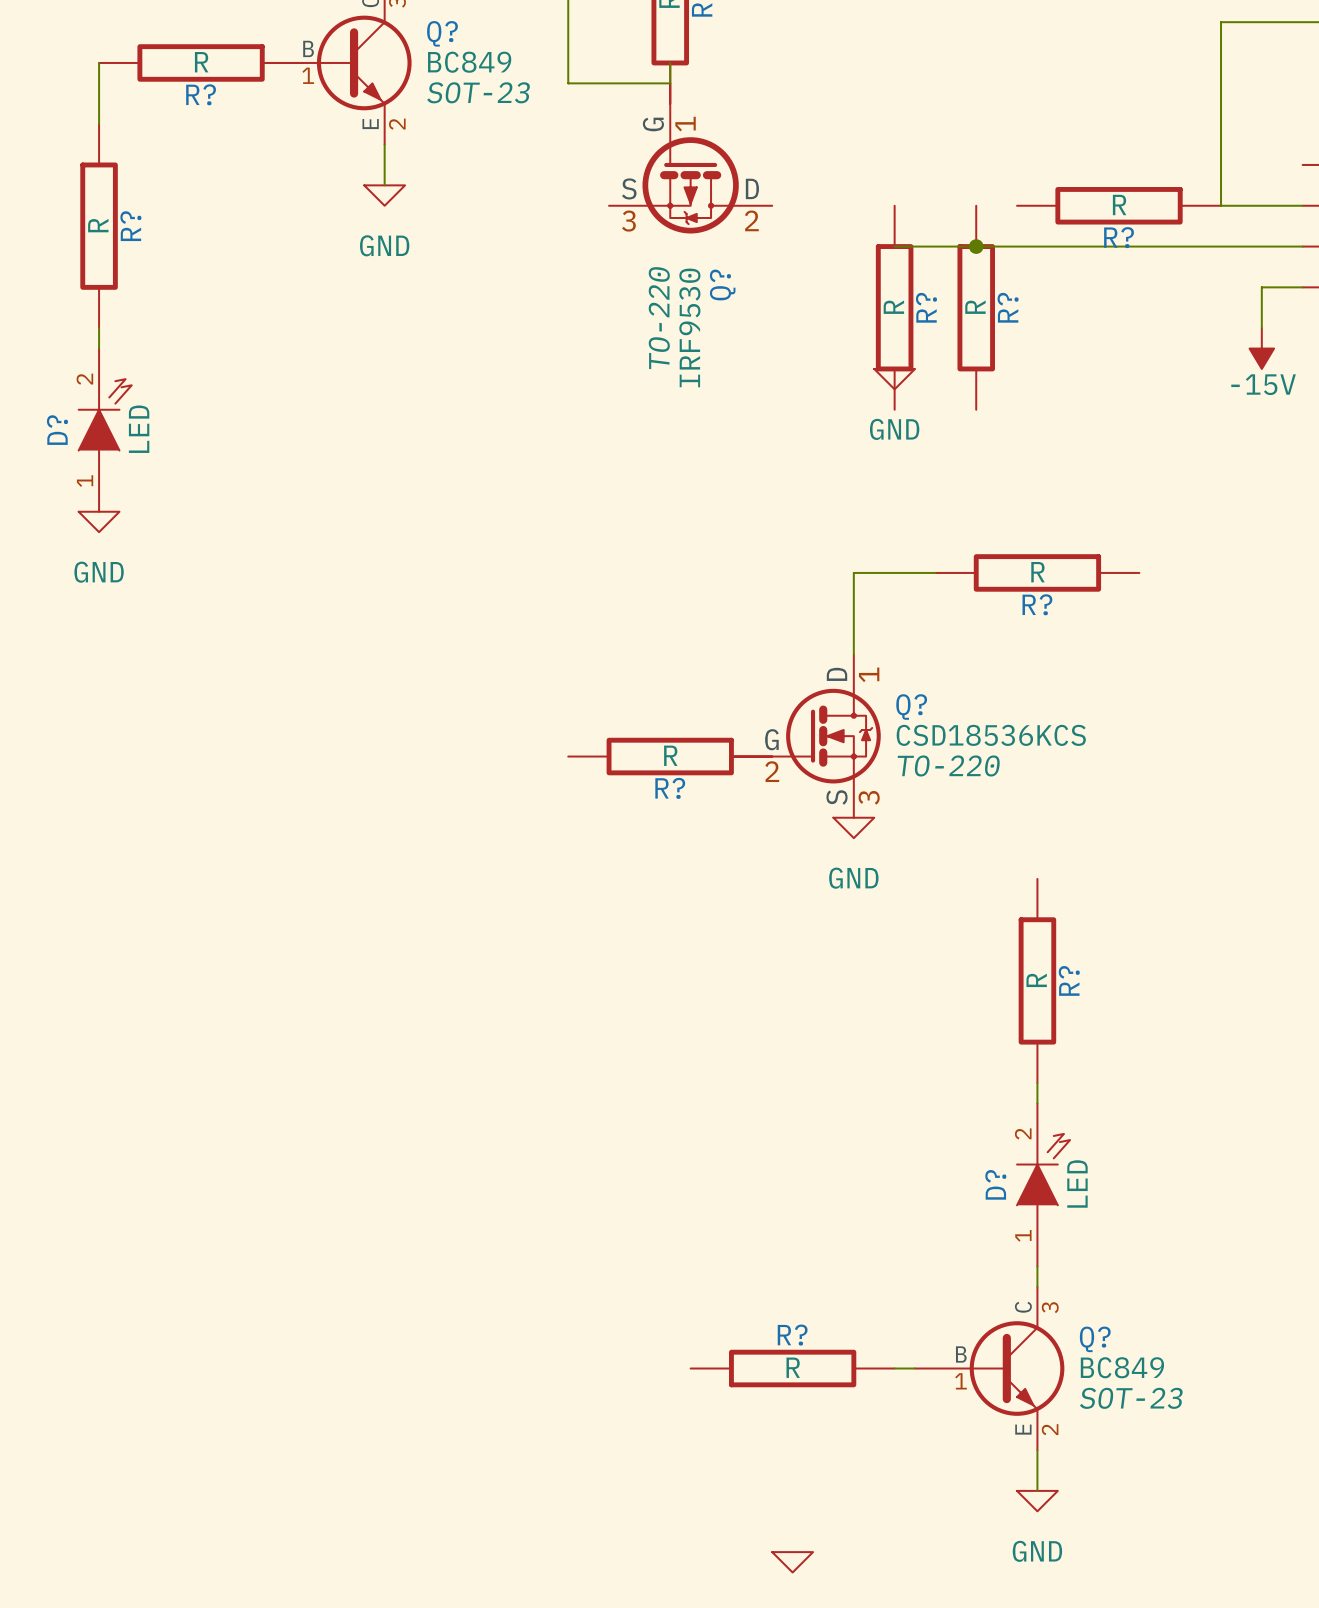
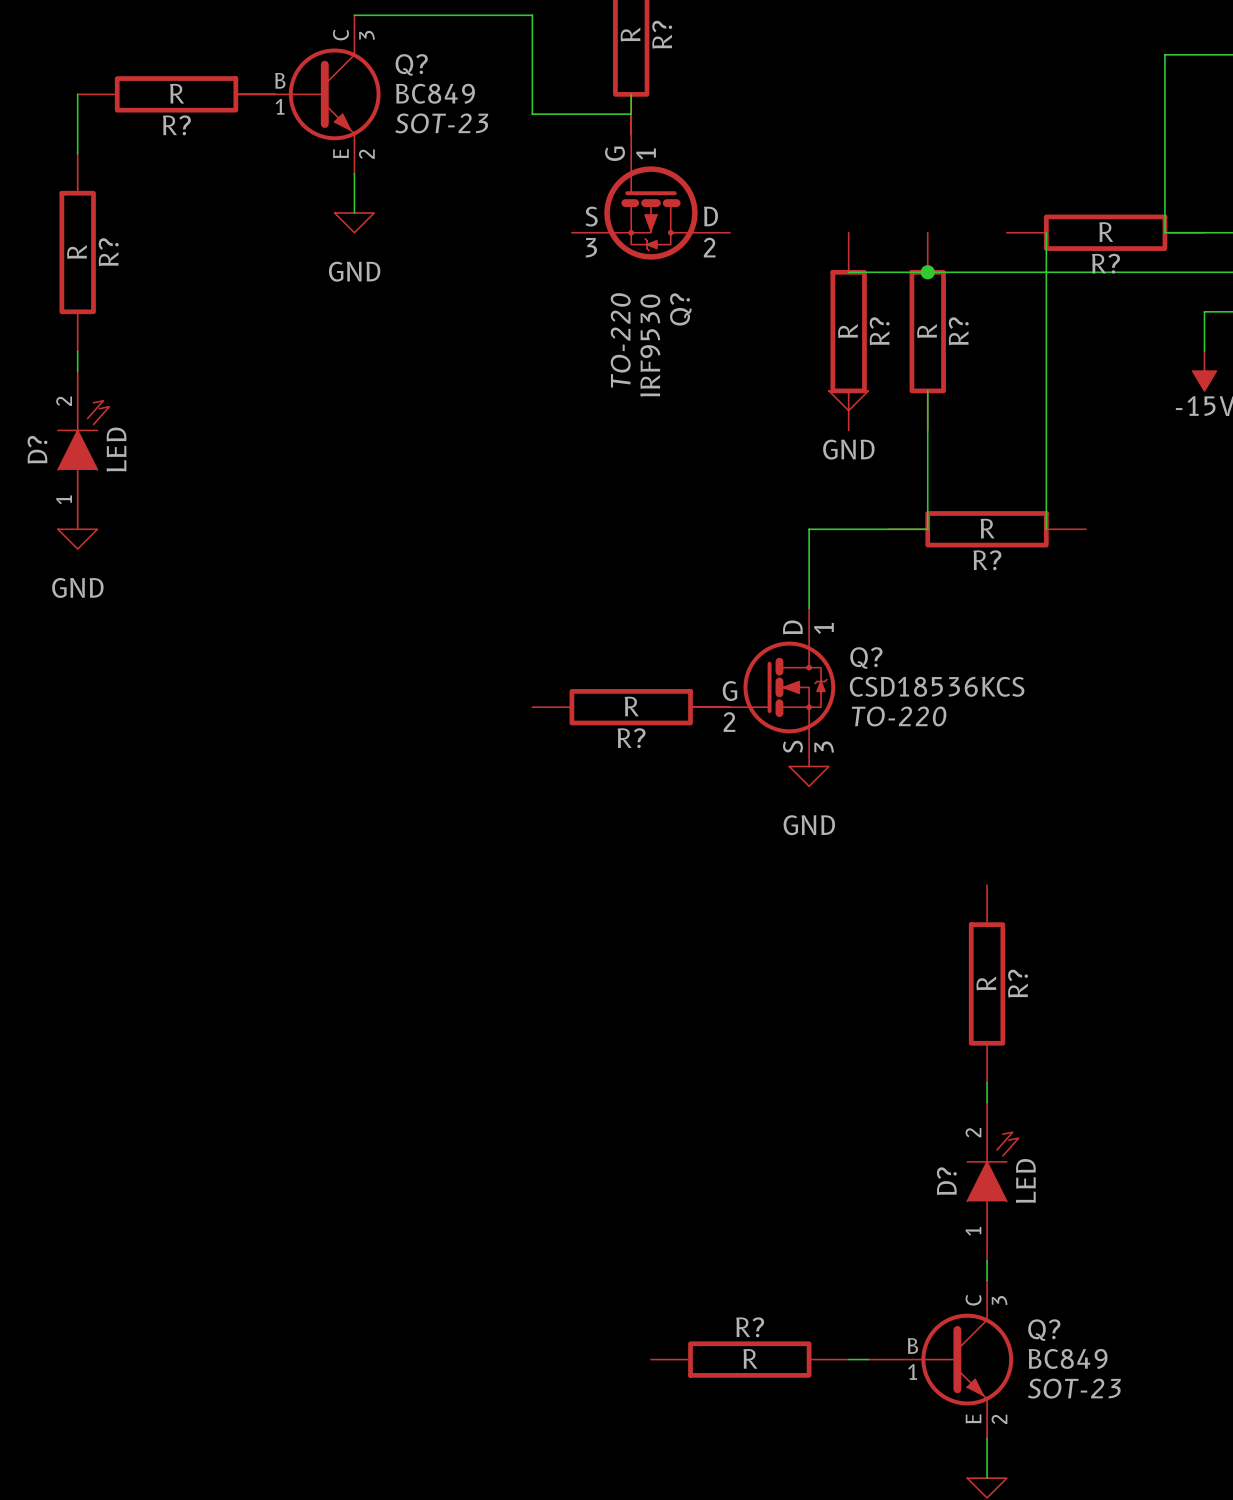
wire: none -> (1046, 232) (1046, 529)
R? position: (1119, 205) -> (1105, 232)
wire: (853, 572) (935, 572) -> (809, 588) (809, 529) (927, 529) (927, 390)
R? position: (1037, 572) -> (987, 529)
Q? position: (806, 736) -> (762, 687)
R? position: (670, 756) -> (631, 707)
power symbol position: GND (853, 827) -> GND (809, 776)

